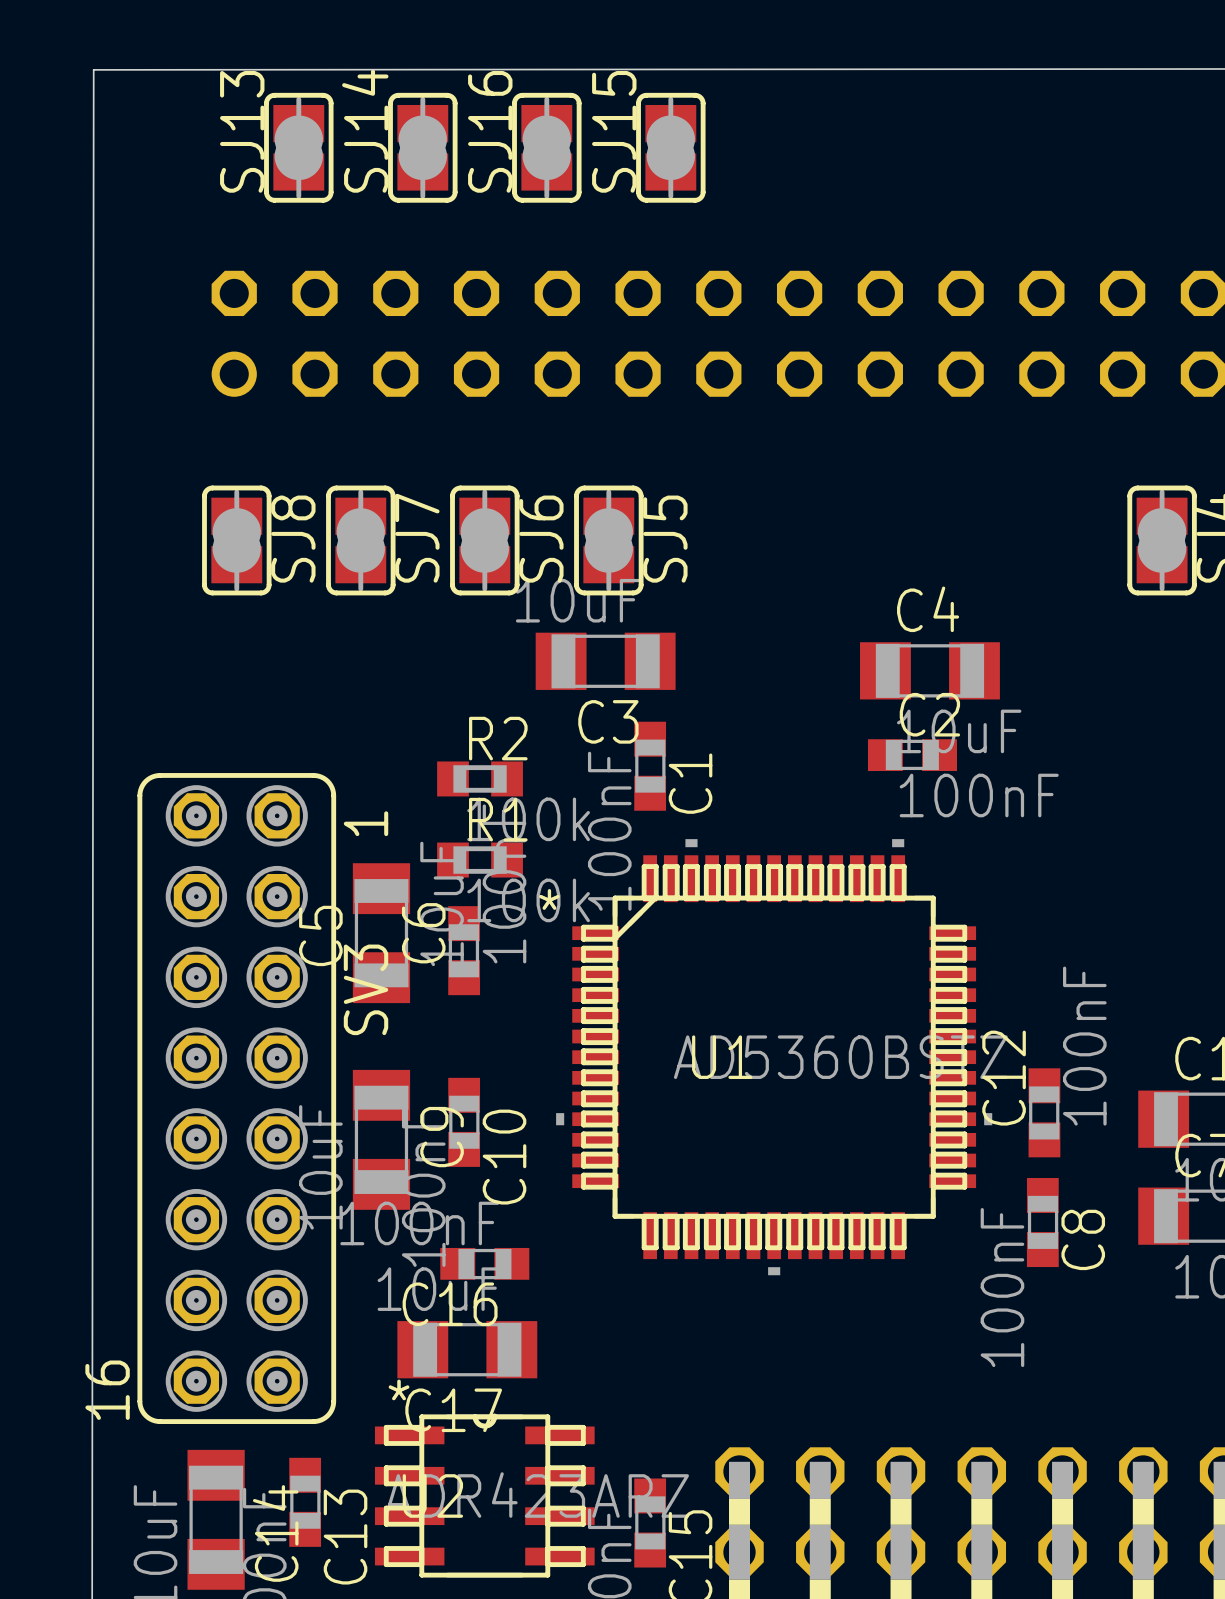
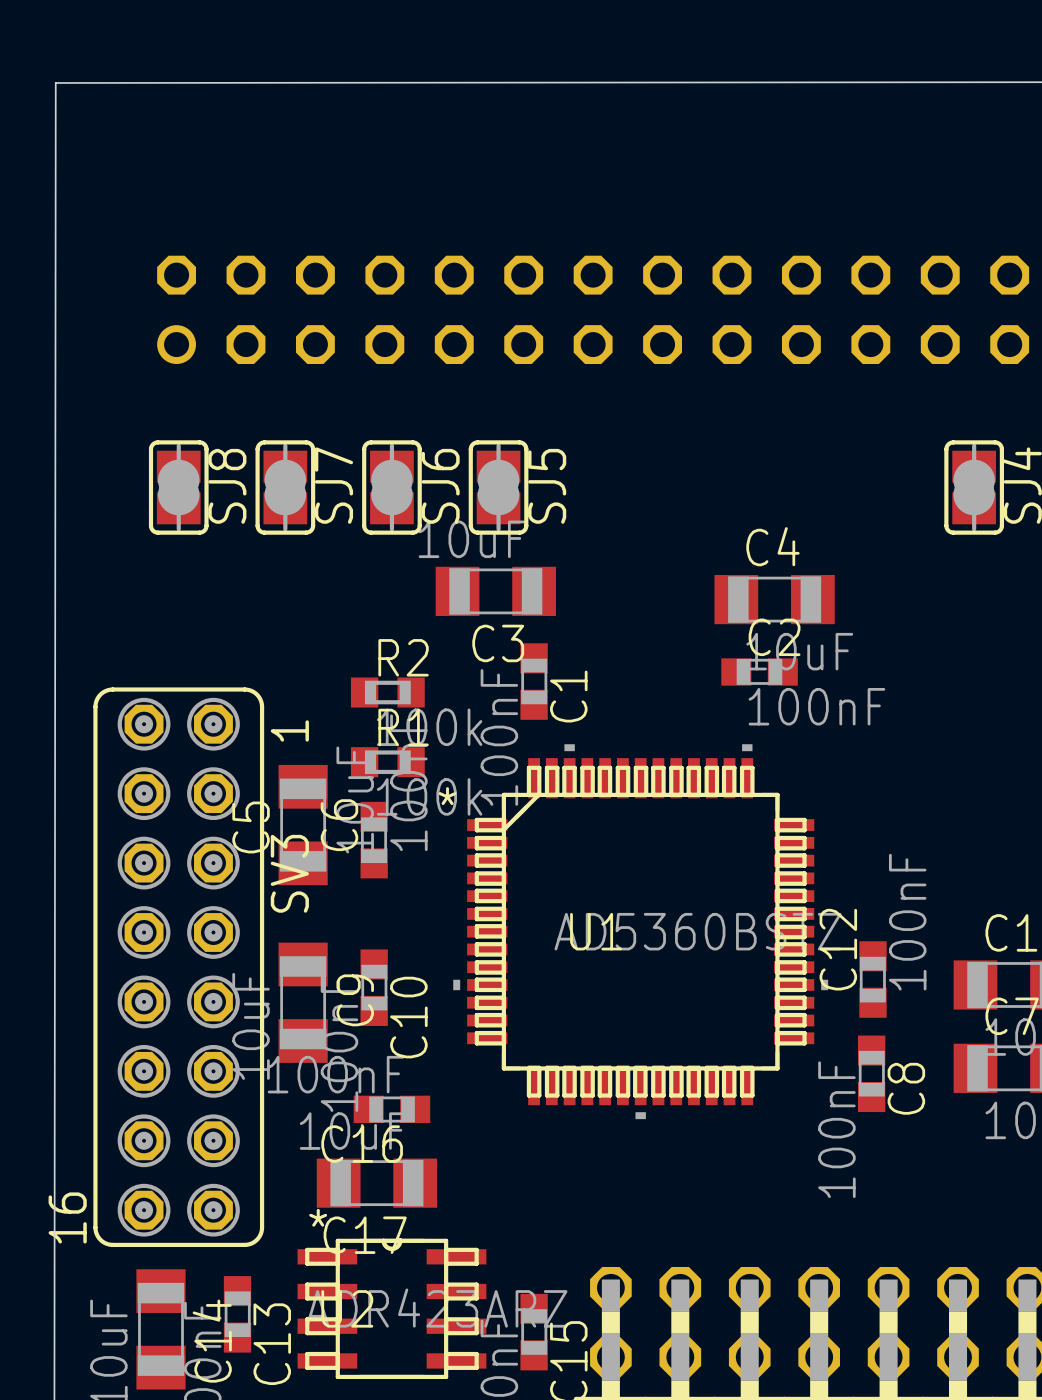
SJ13: (298, 147) -> none
SJ14: (422, 147) -> none
SJ16: (546, 147) -> none
SJ15: (670, 147) -> none

